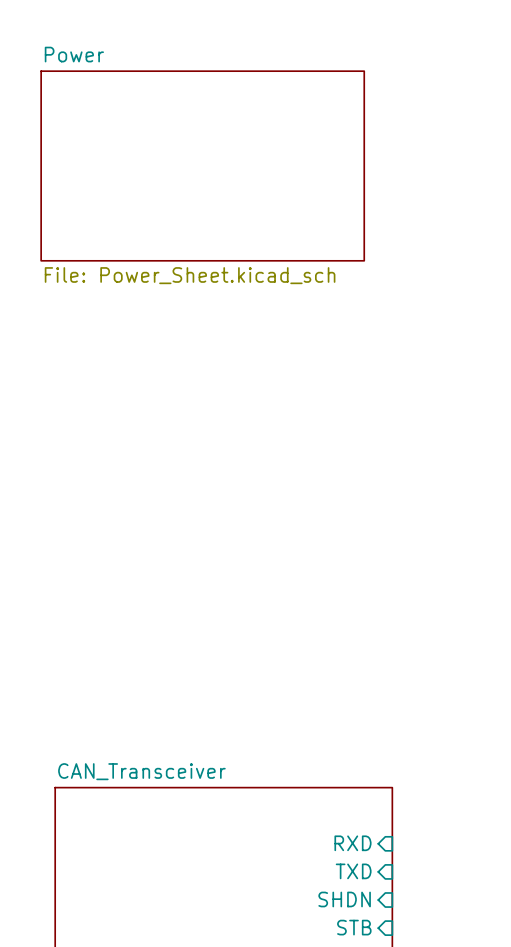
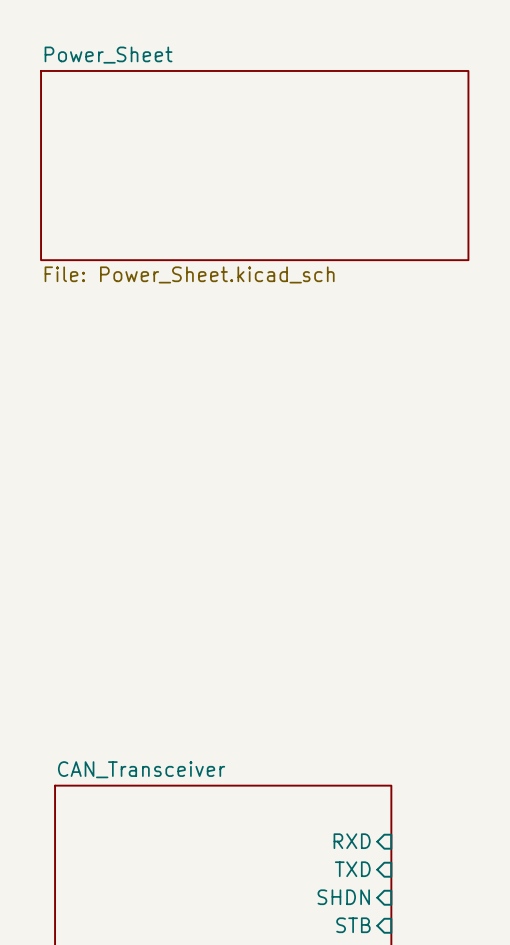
sheet Power: File: Power_Sheet.kicad_sch (202, 165) -> none
sheet Power_Sheet: none -> File: Power_Sheet.kicad_sch (254, 165)

